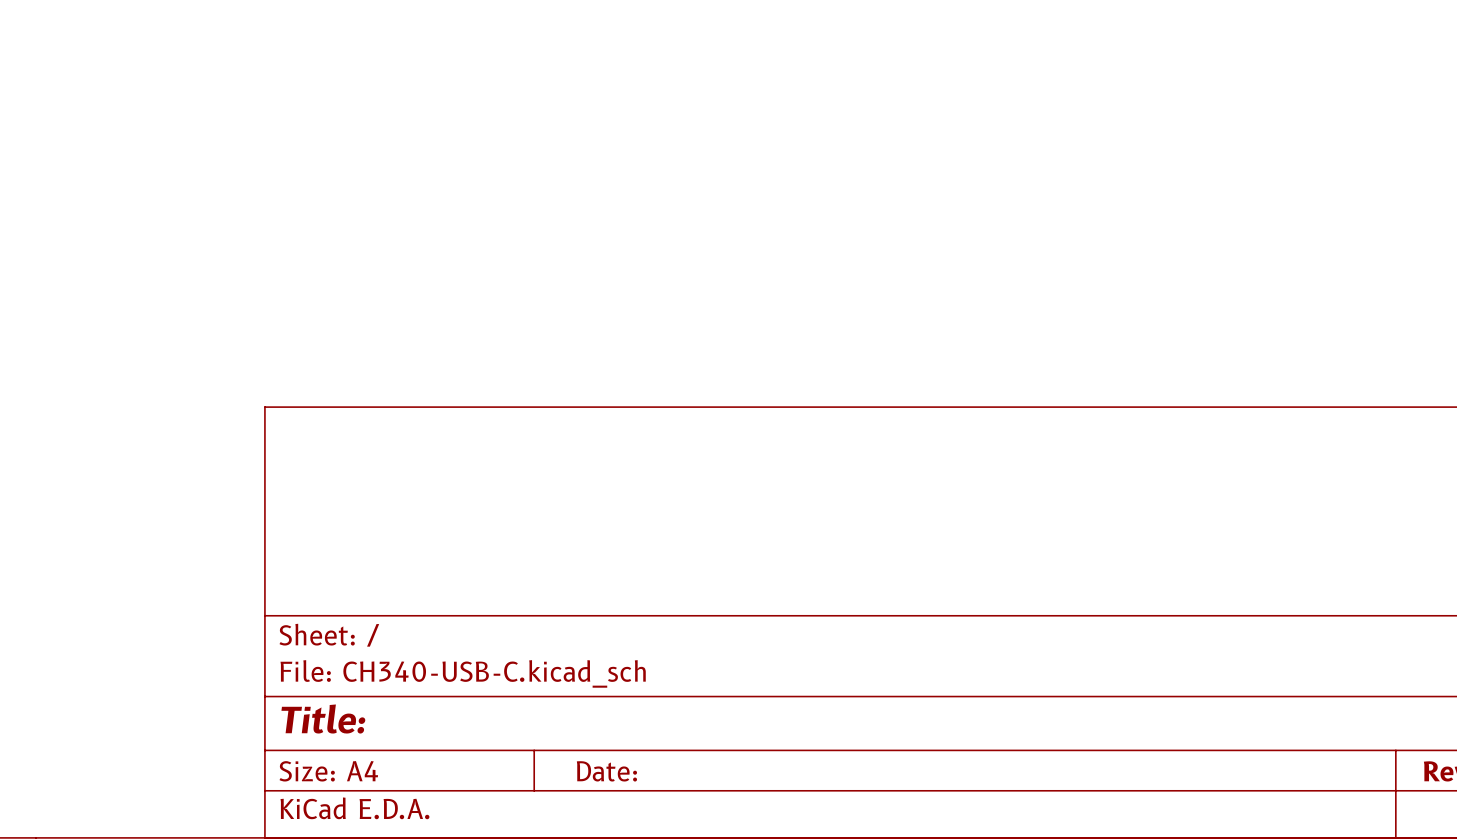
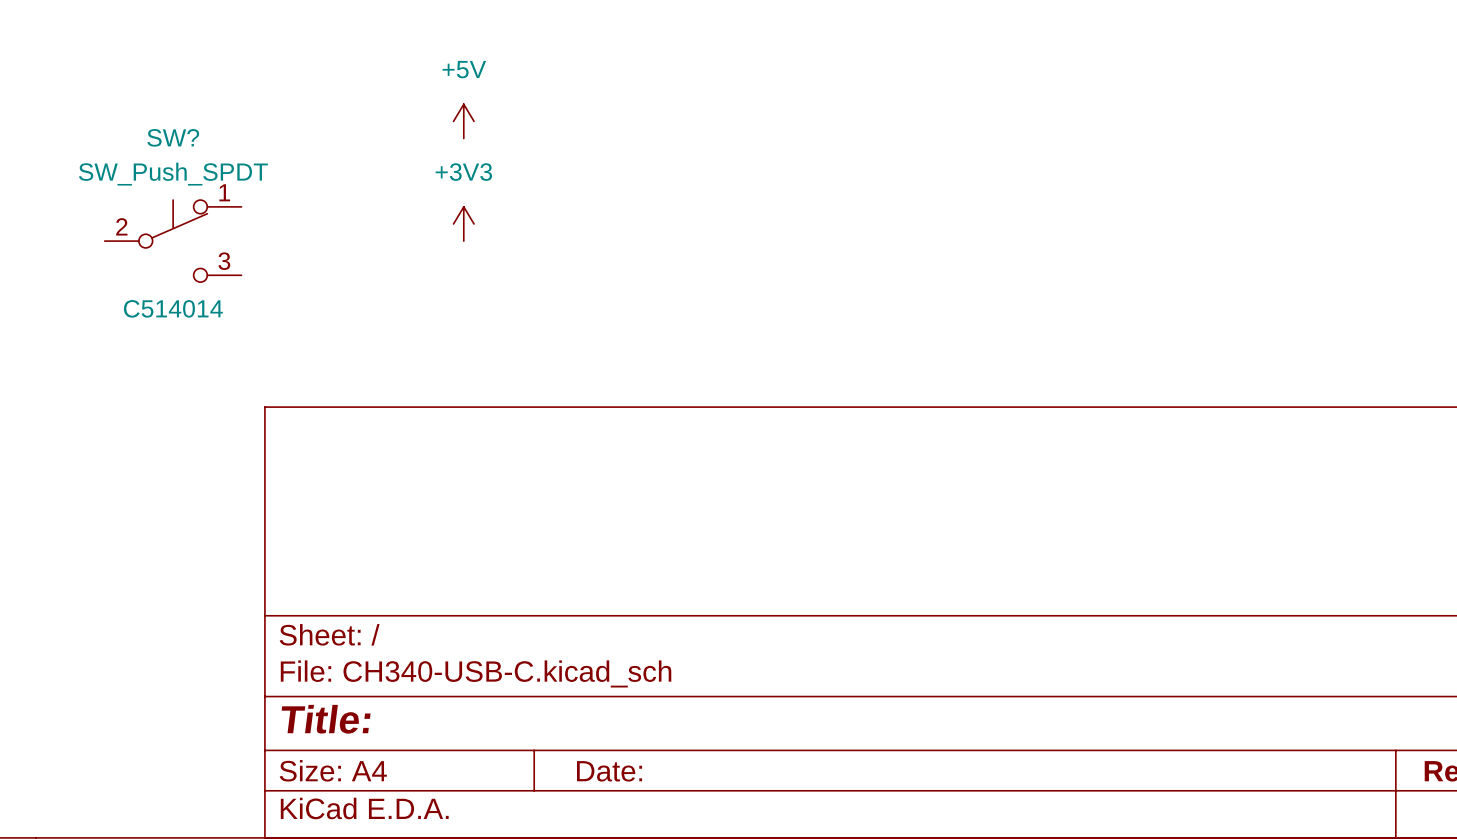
power symbol: none -> +5V (463, 121)
power symbol: none -> +3V3 (463, 223)
SW?: none -> SW_Push_SPDT (173, 241)

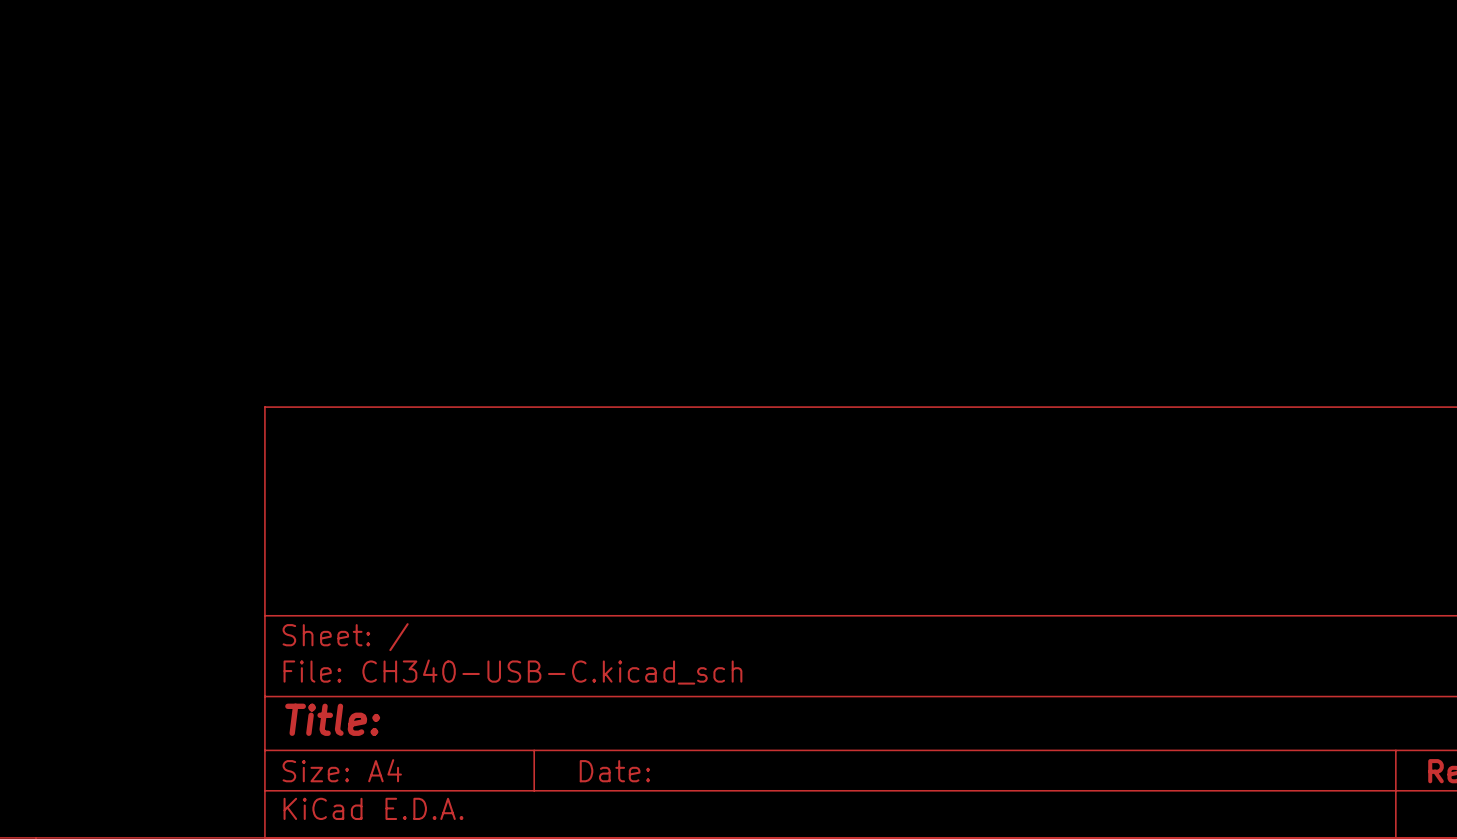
power symbol: +5V (463, 121) -> none
power symbol: +3V3 (463, 223) -> none
SW?: SW_Push_SPDT (173, 241) -> none

